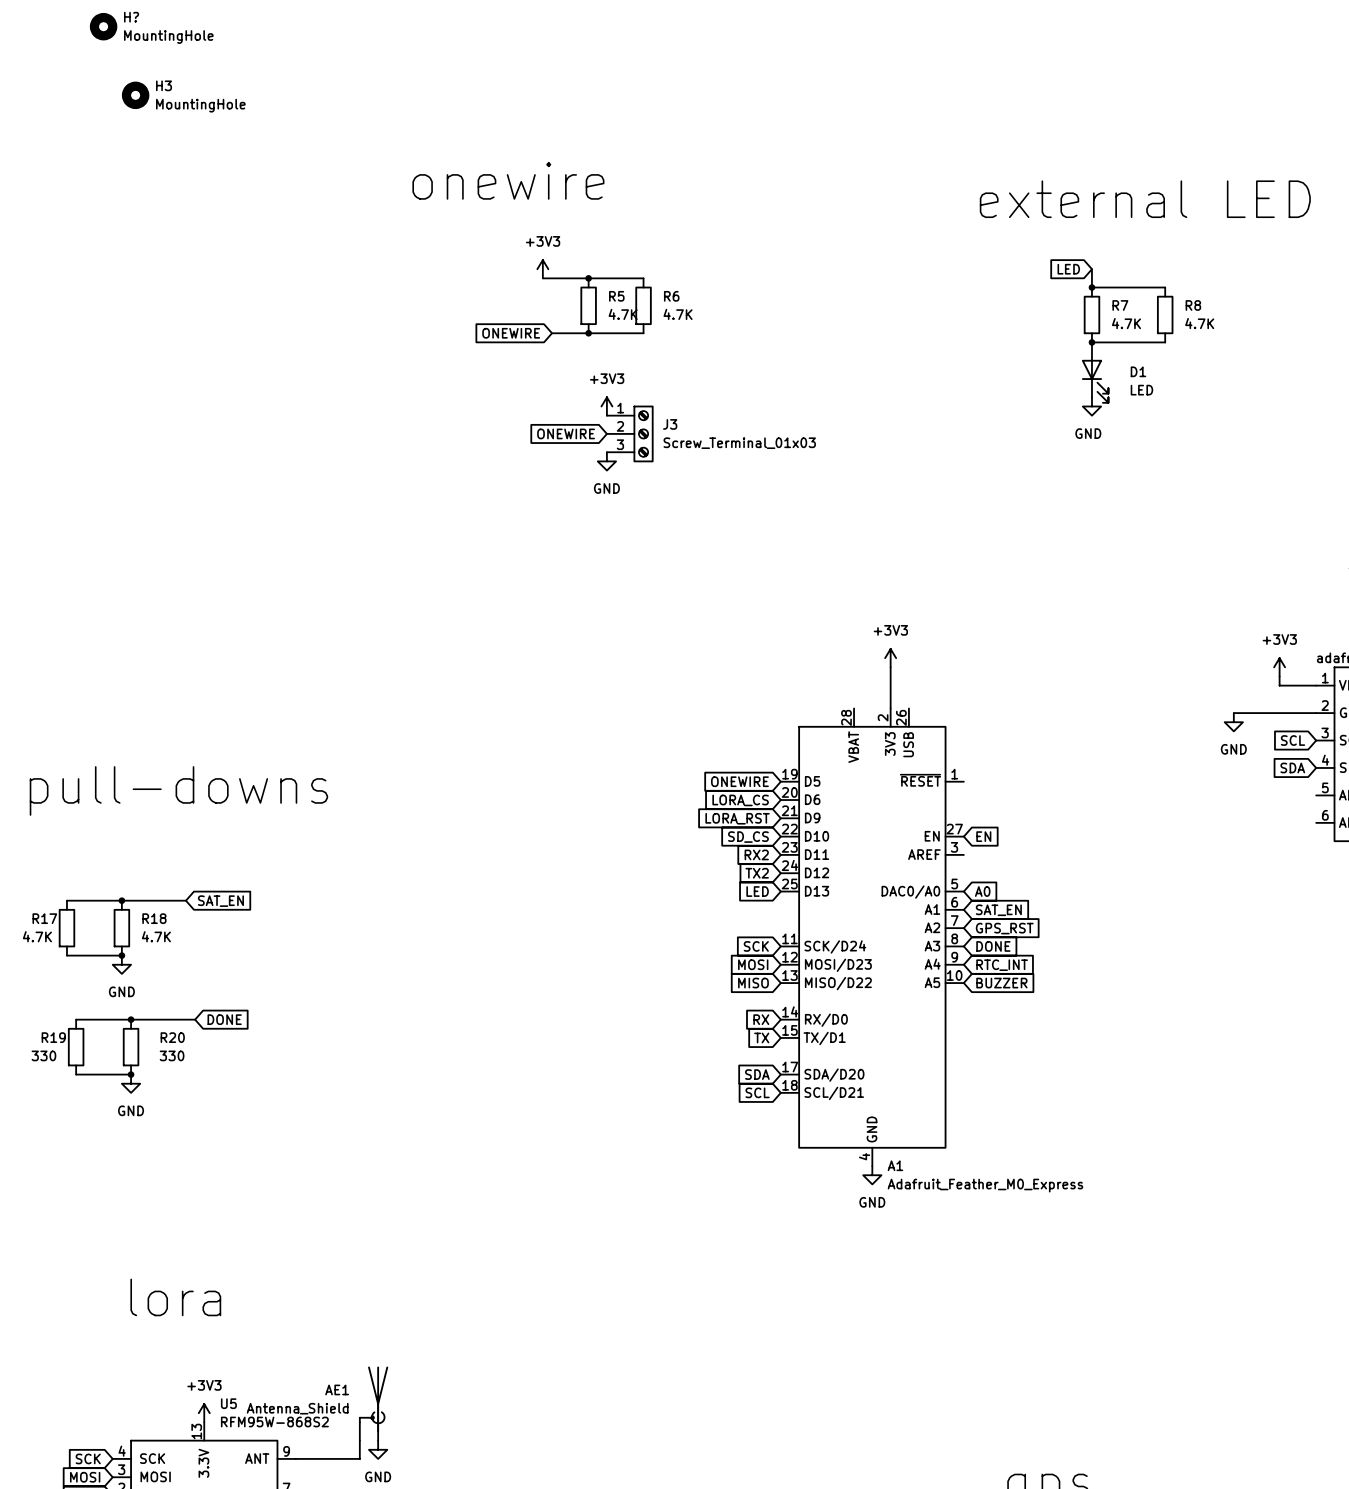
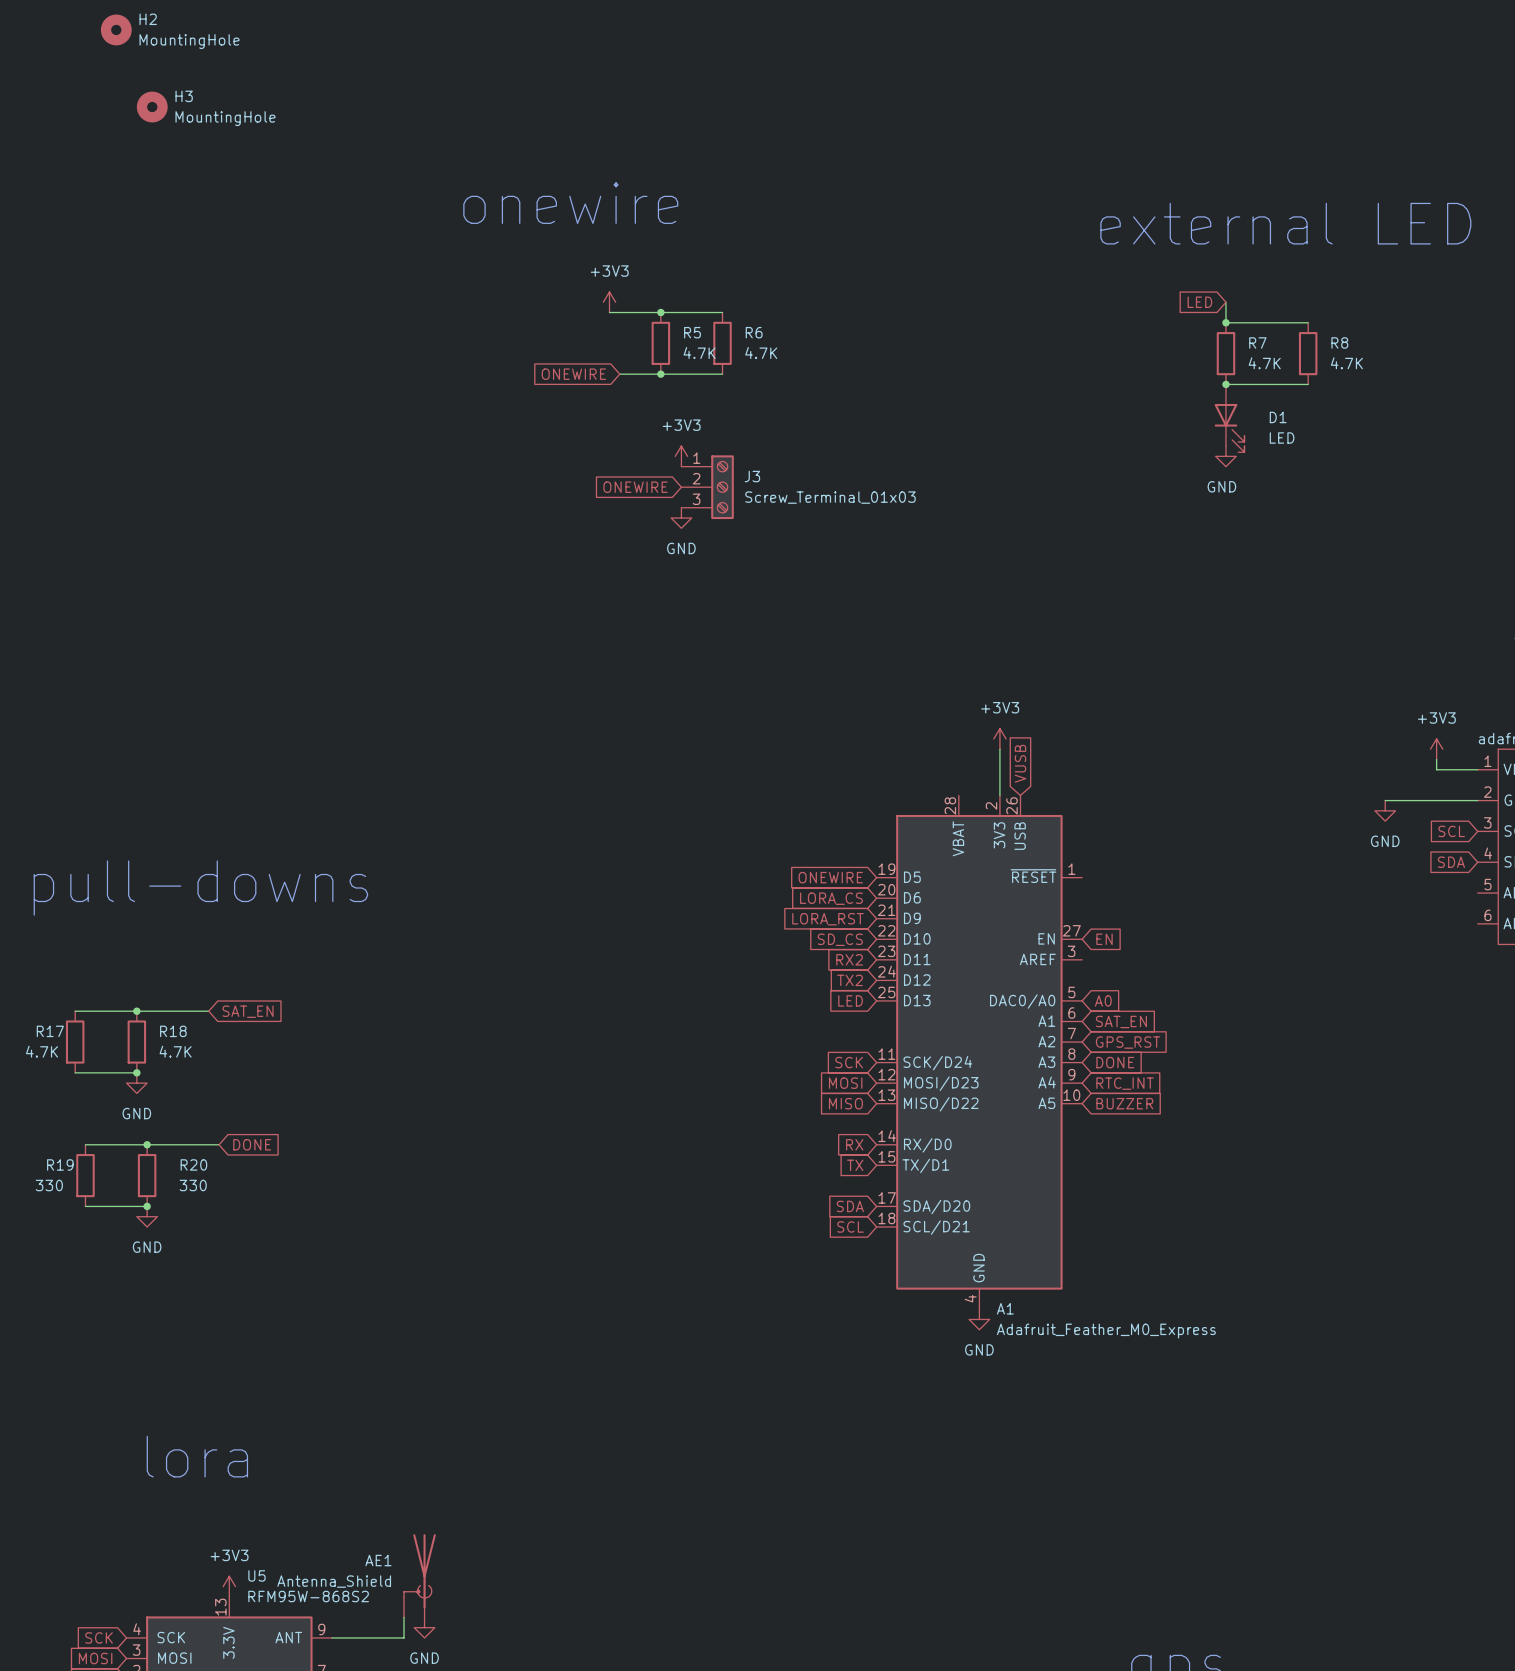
H? name: H? (131, 17) -> H2 (148, 19)
global label: none -> VUSB (1020, 763)

